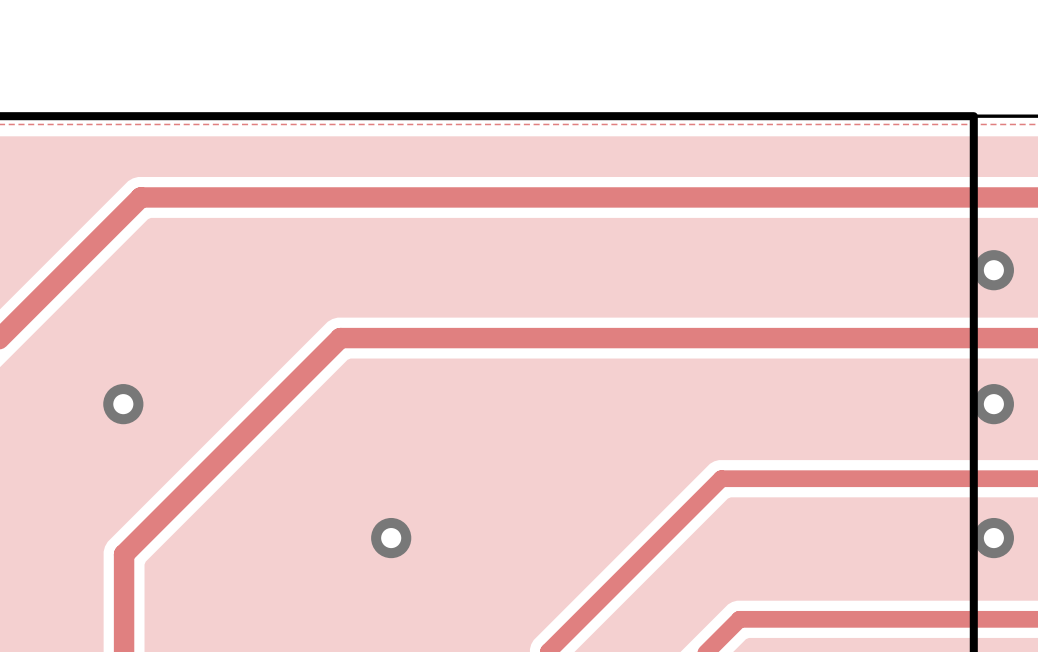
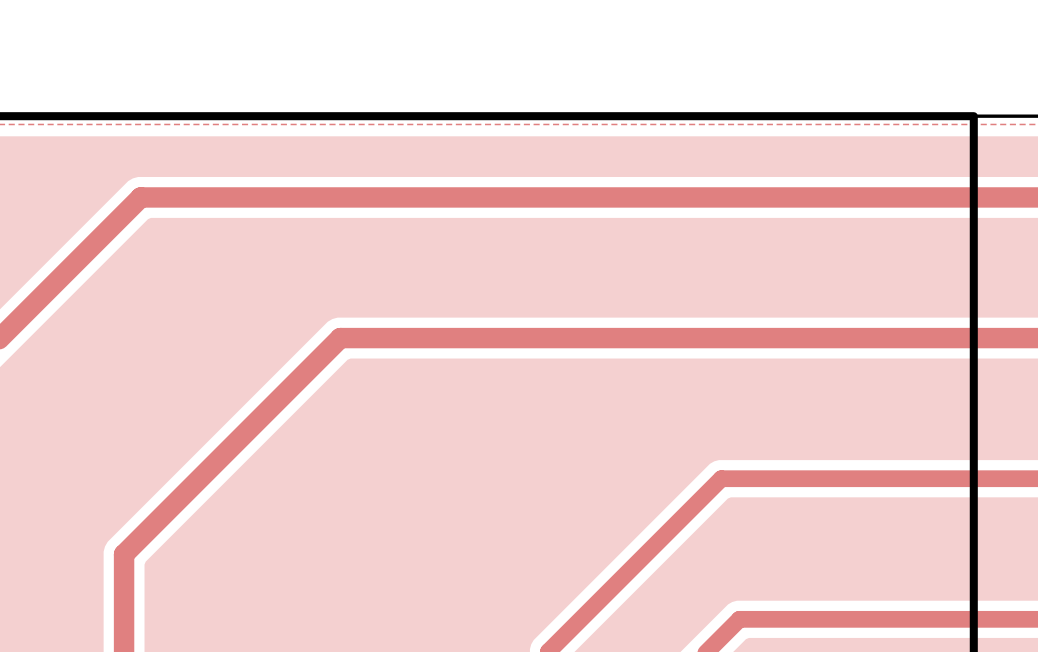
via: (993, 270) -> none
via: (123, 404) -> none
via: (993, 404) -> none
via: (391, 538) -> none
via: (993, 538) -> none

